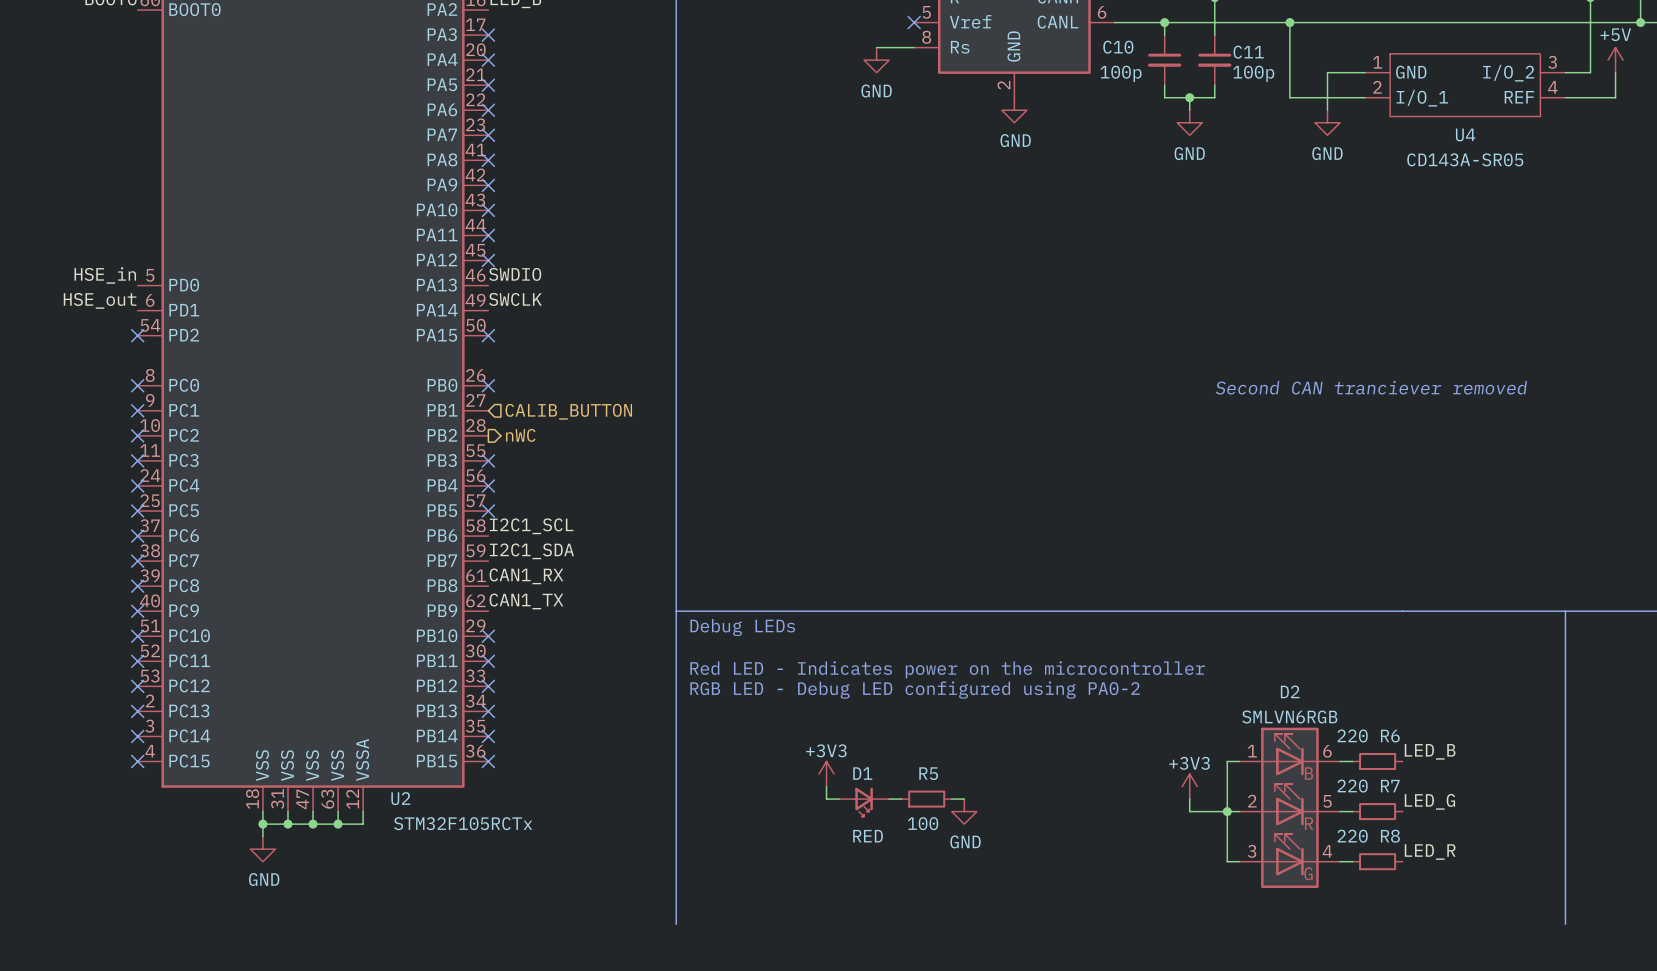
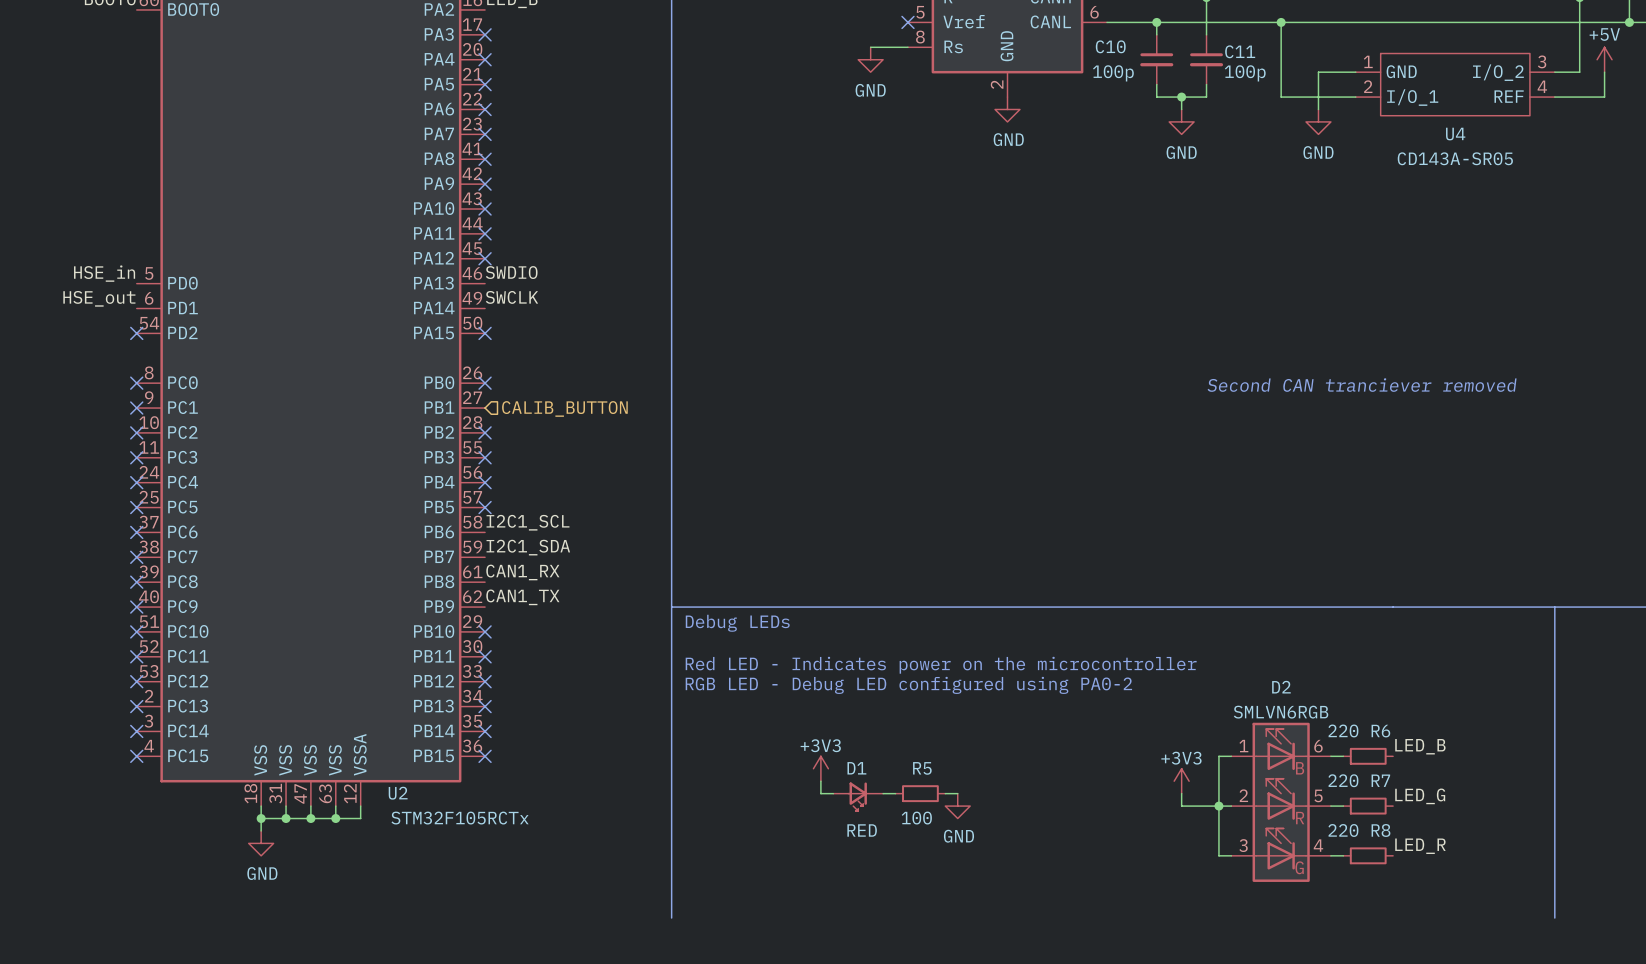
no-connect mark: none -> (485, 432)
hierarchical label: nWC (520, 435) -> none

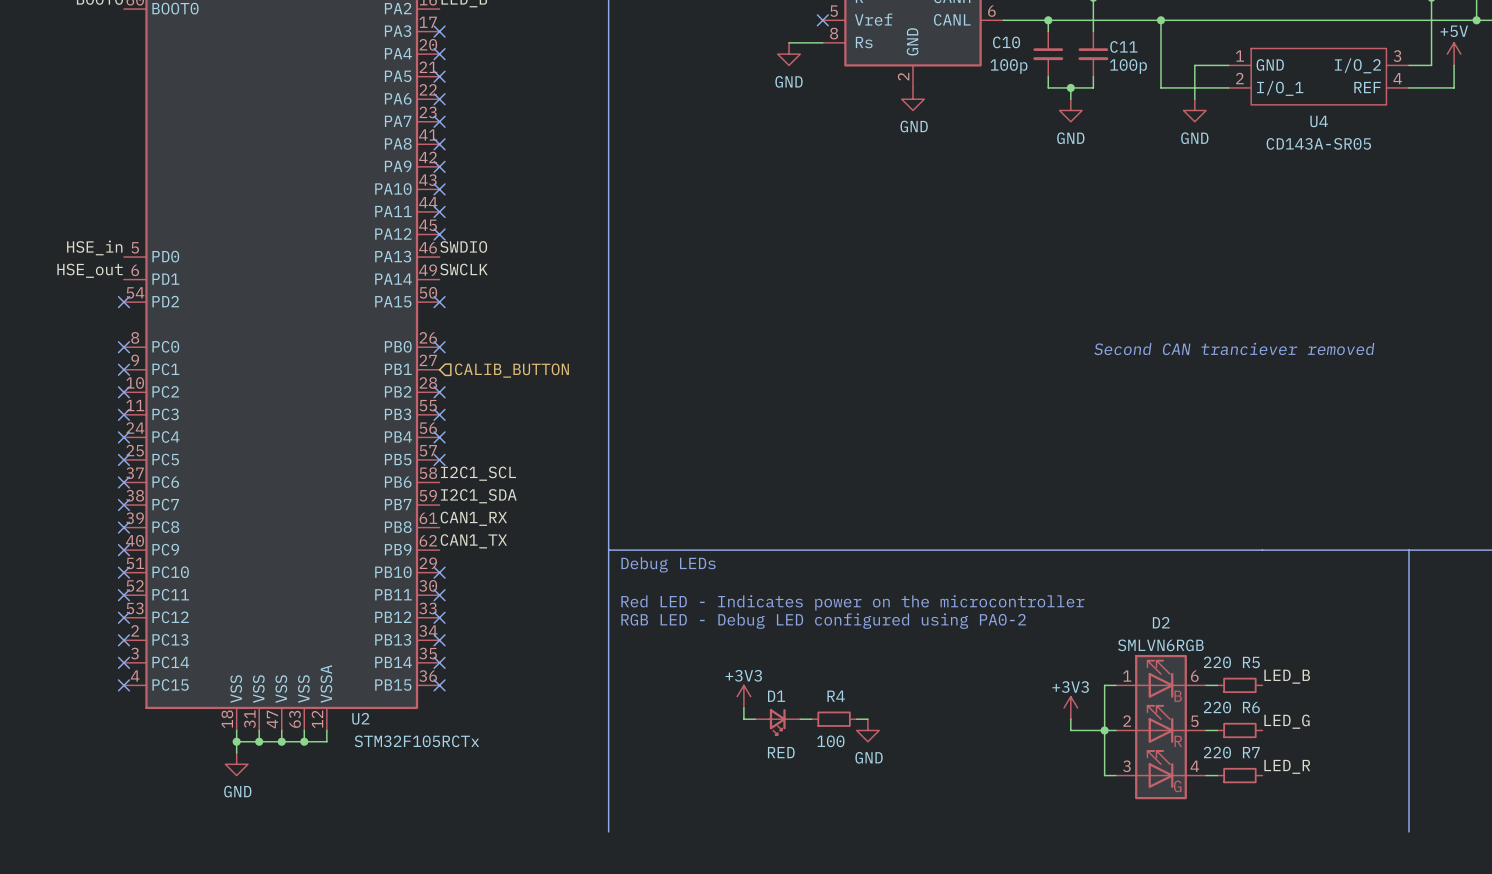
R6 name: R6 (1380, 731) -> R5 (1251, 662)
R5 name: R5 (922, 768) -> R4 (836, 696)
R7 name: R7 (1380, 780) -> R6 (1251, 707)
R8 name: R8 (1380, 830) -> R7 (1251, 752)

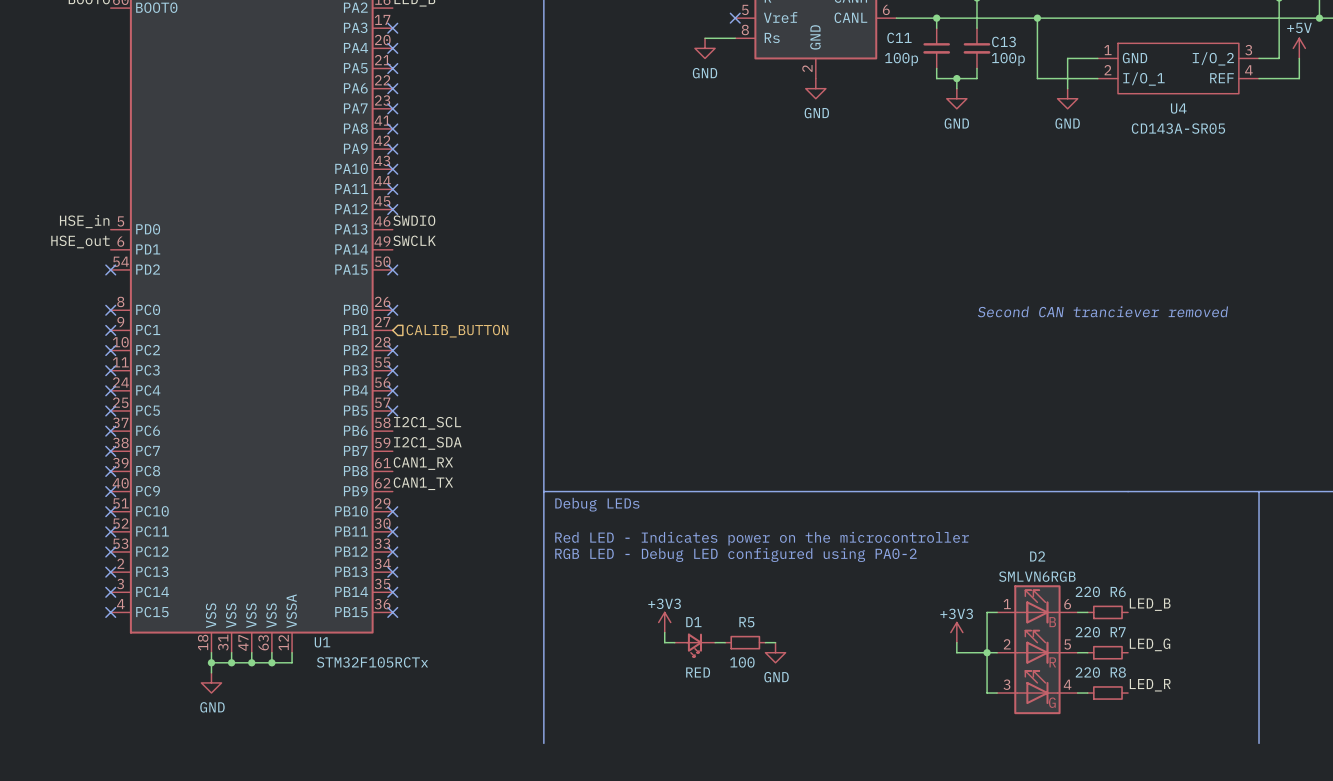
C10 name: C10 (1006, 42) -> C11 (899, 37)
C11 name: C11 (1123, 46) -> C13 (1003, 41)
R5 name: R5 (1251, 662) -> R6 (1118, 592)
R4 name: R4 (836, 696) -> R5 (746, 622)
R6 name: R6 (1251, 707) -> R7 (1118, 632)
U2 name: U2 (360, 718) -> U1 (322, 642)
R7 name: R7 (1251, 752) -> R8 (1118, 672)

